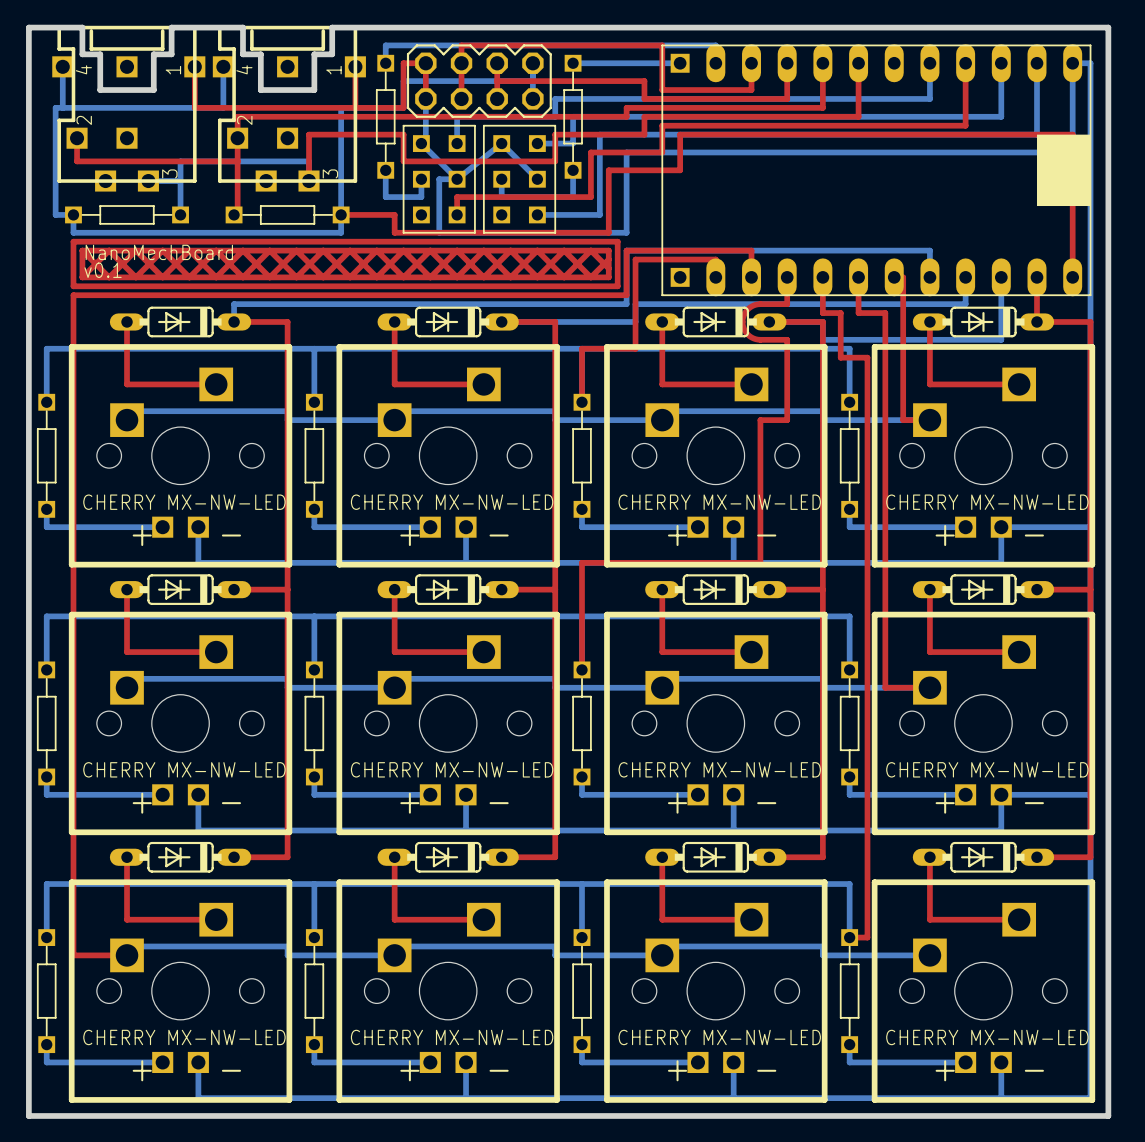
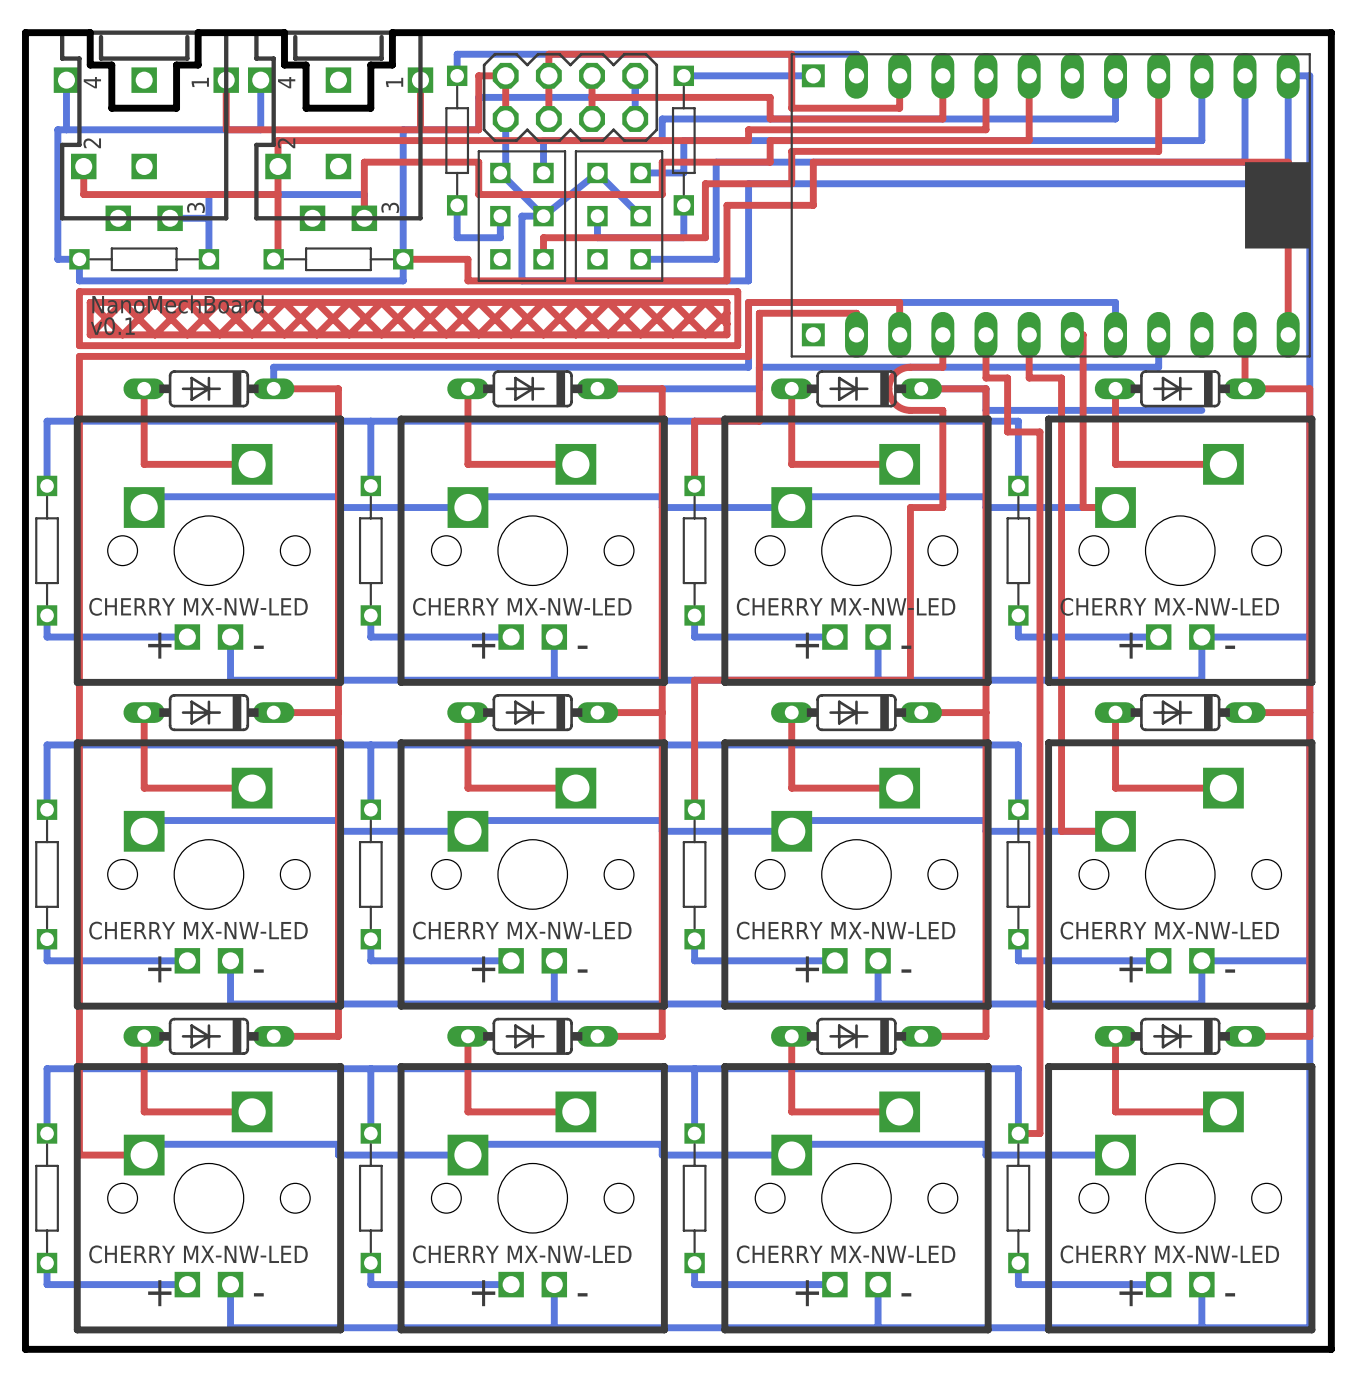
bottom track: (1001, 277) (1001, 339) -> none

